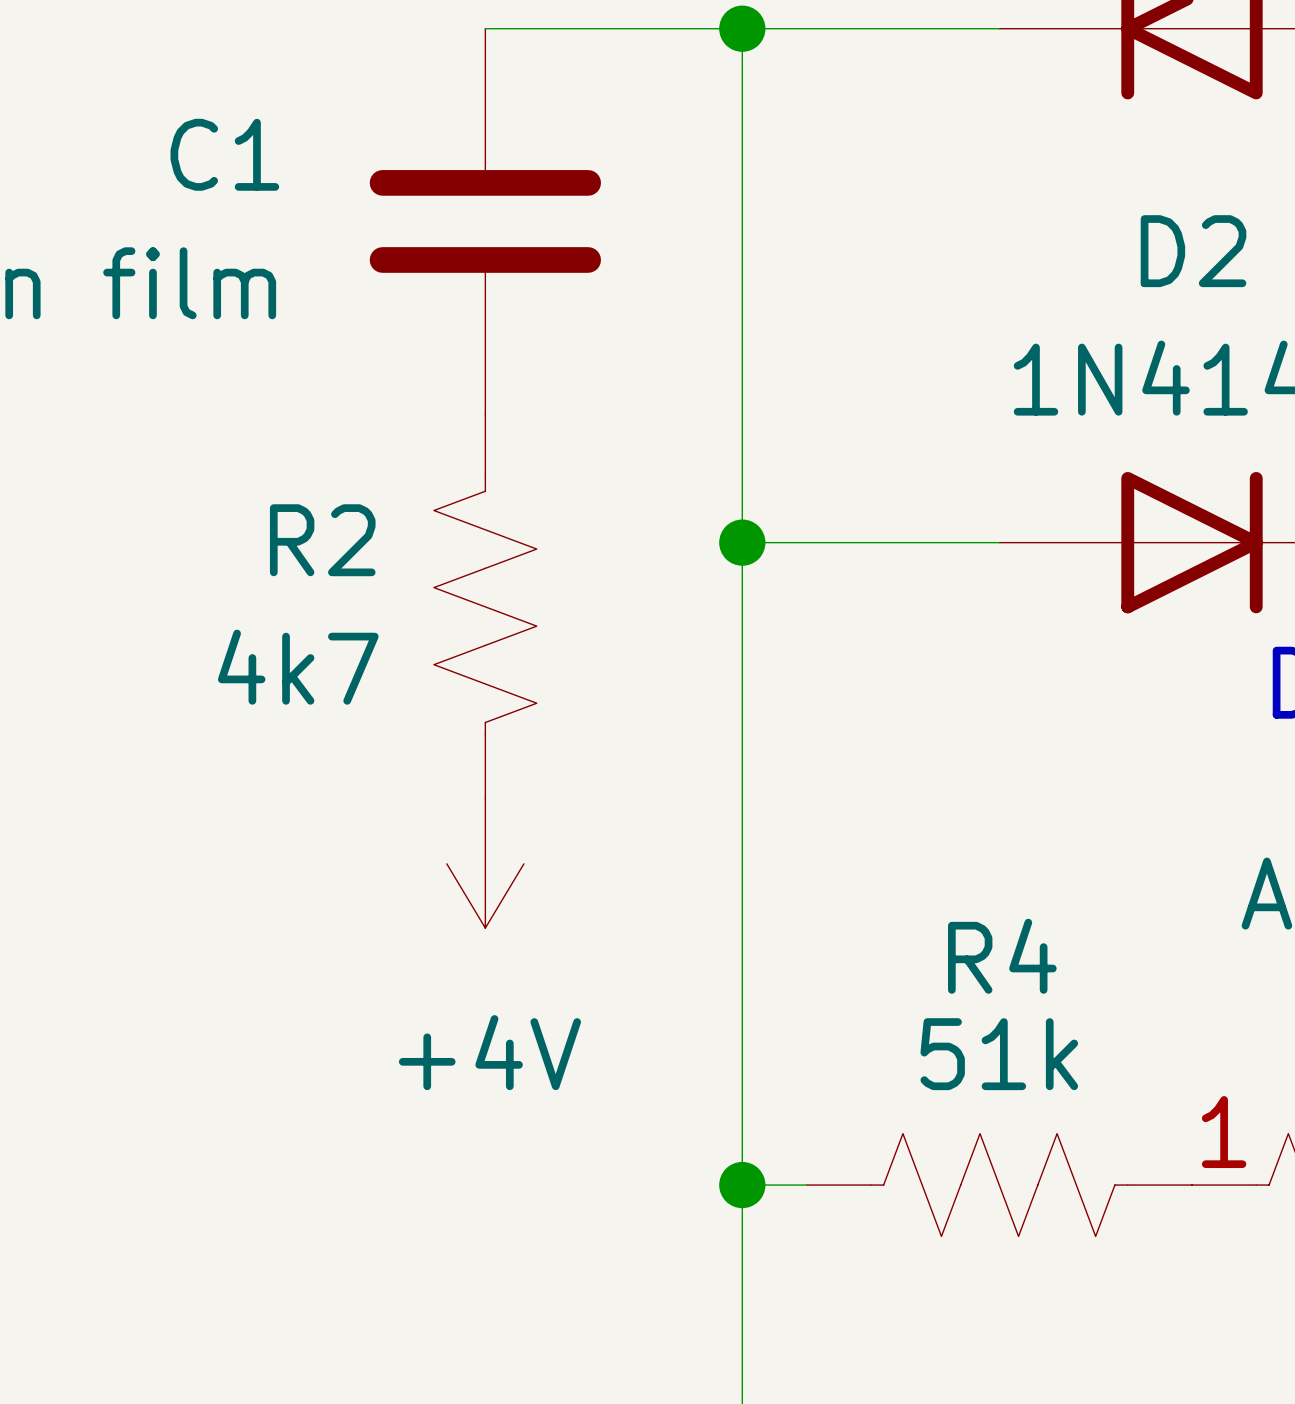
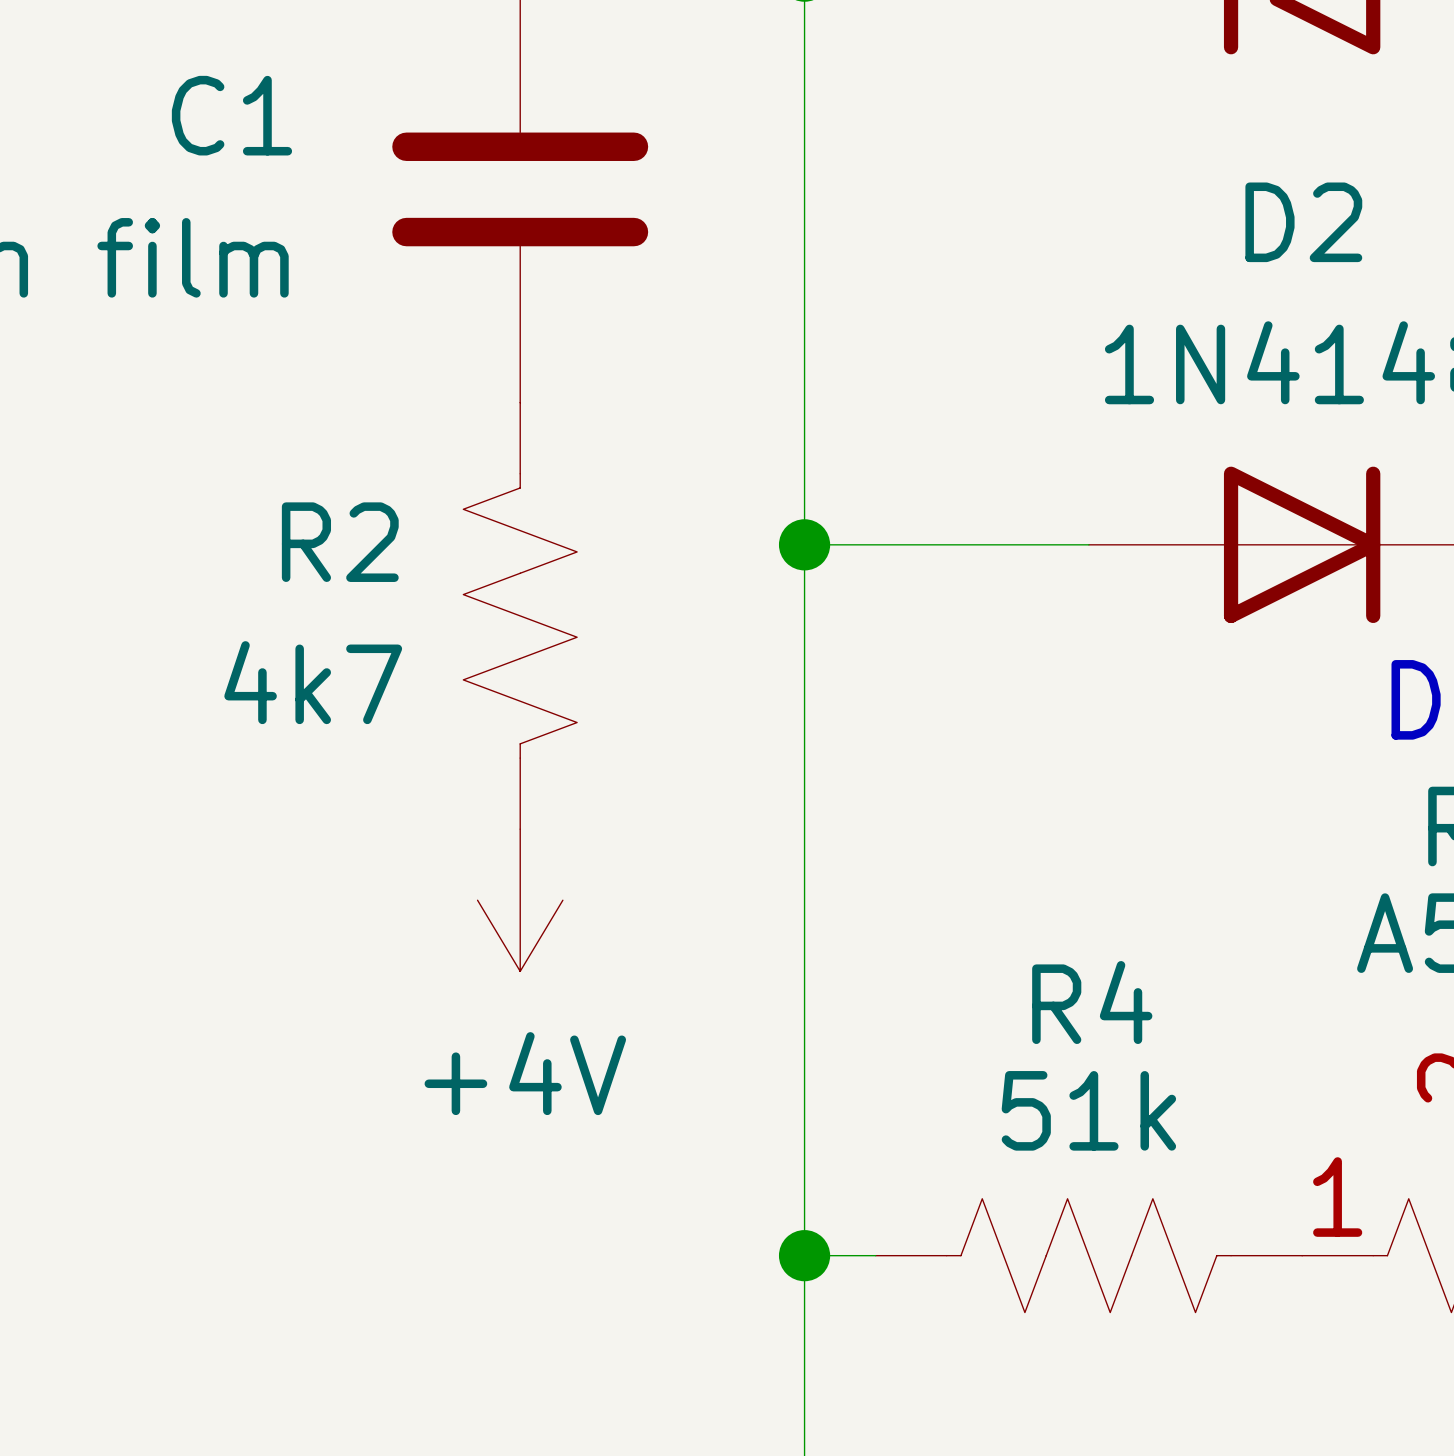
power symbol text position: +4V (489, 1052) -> +4V (525, 1073)

